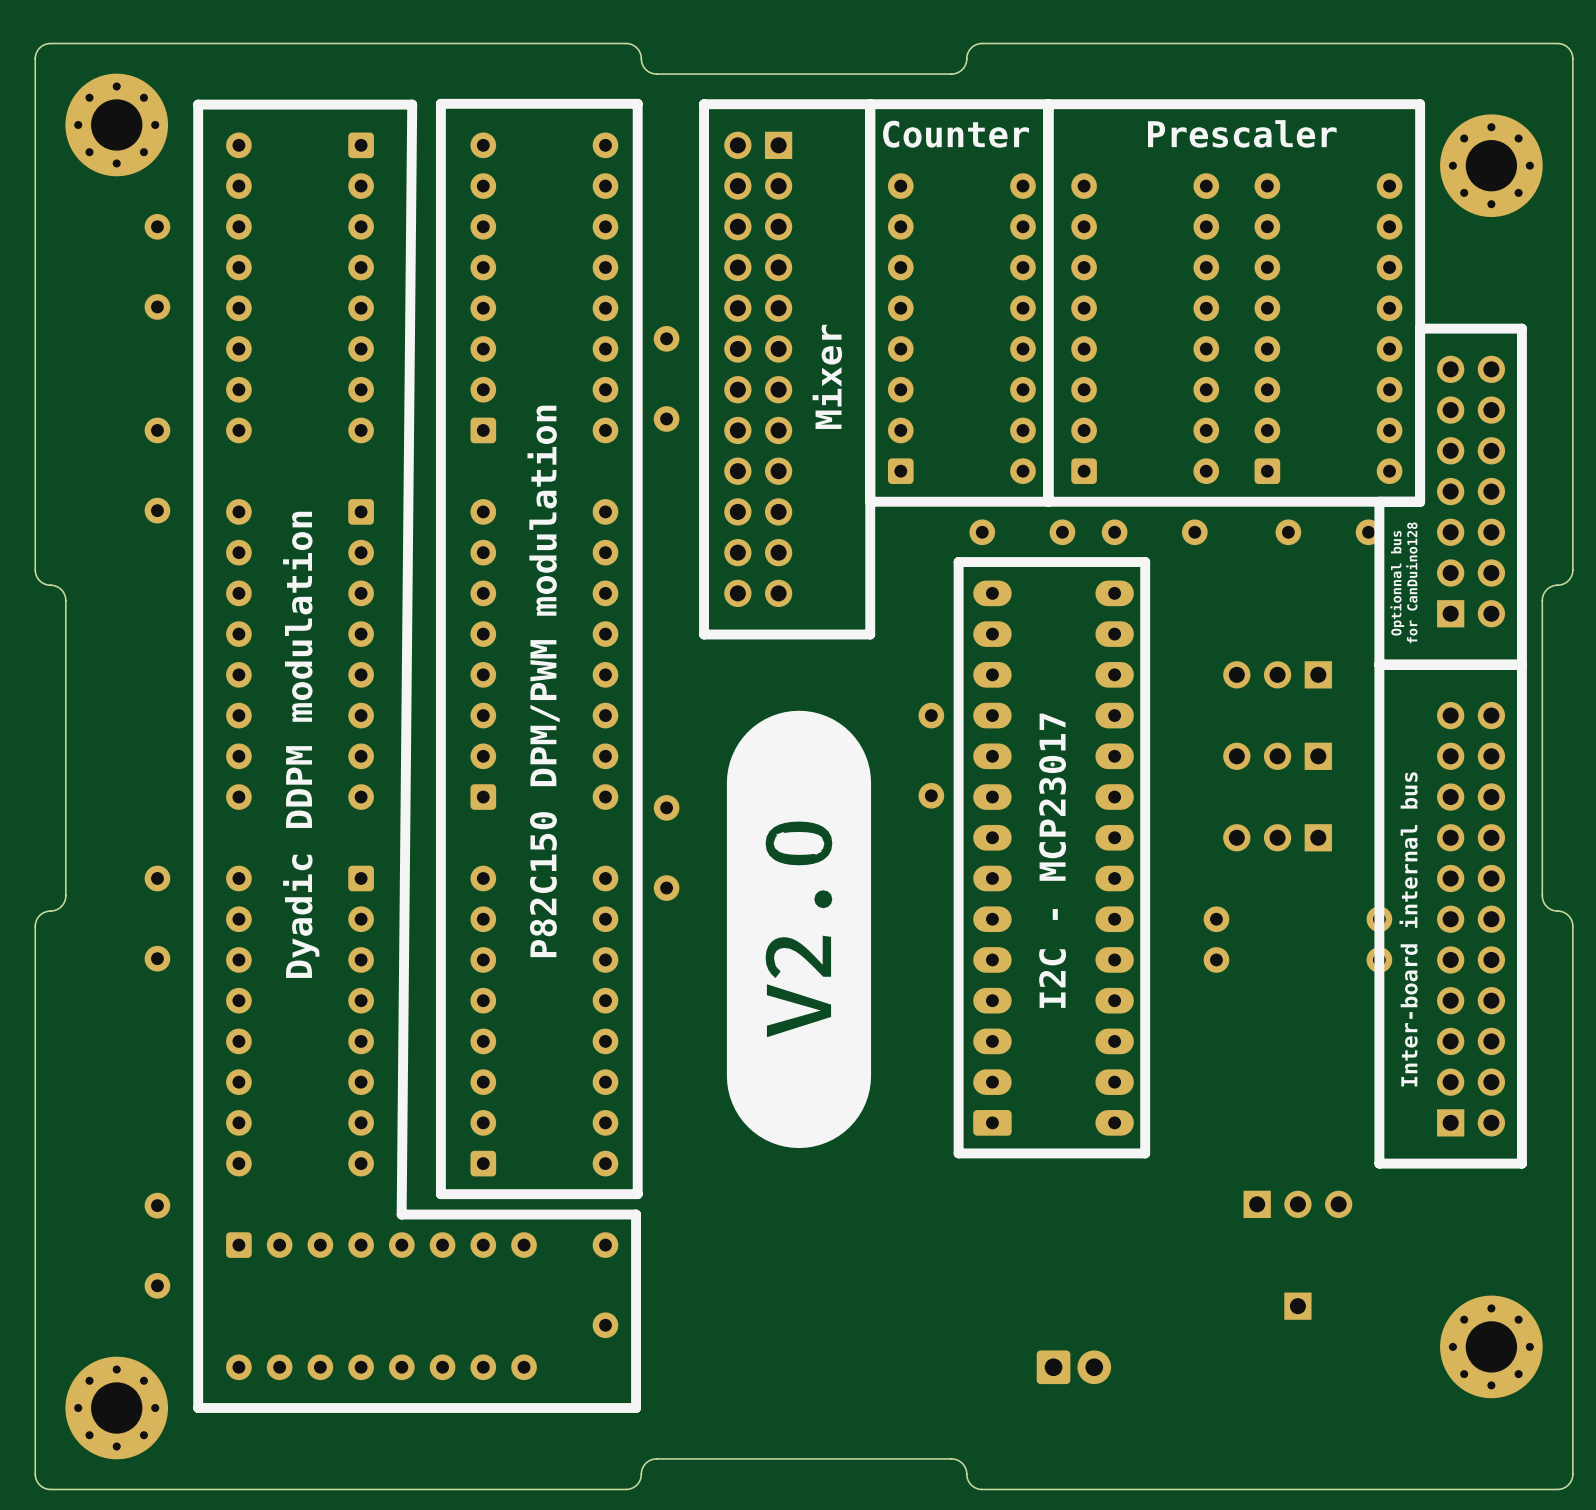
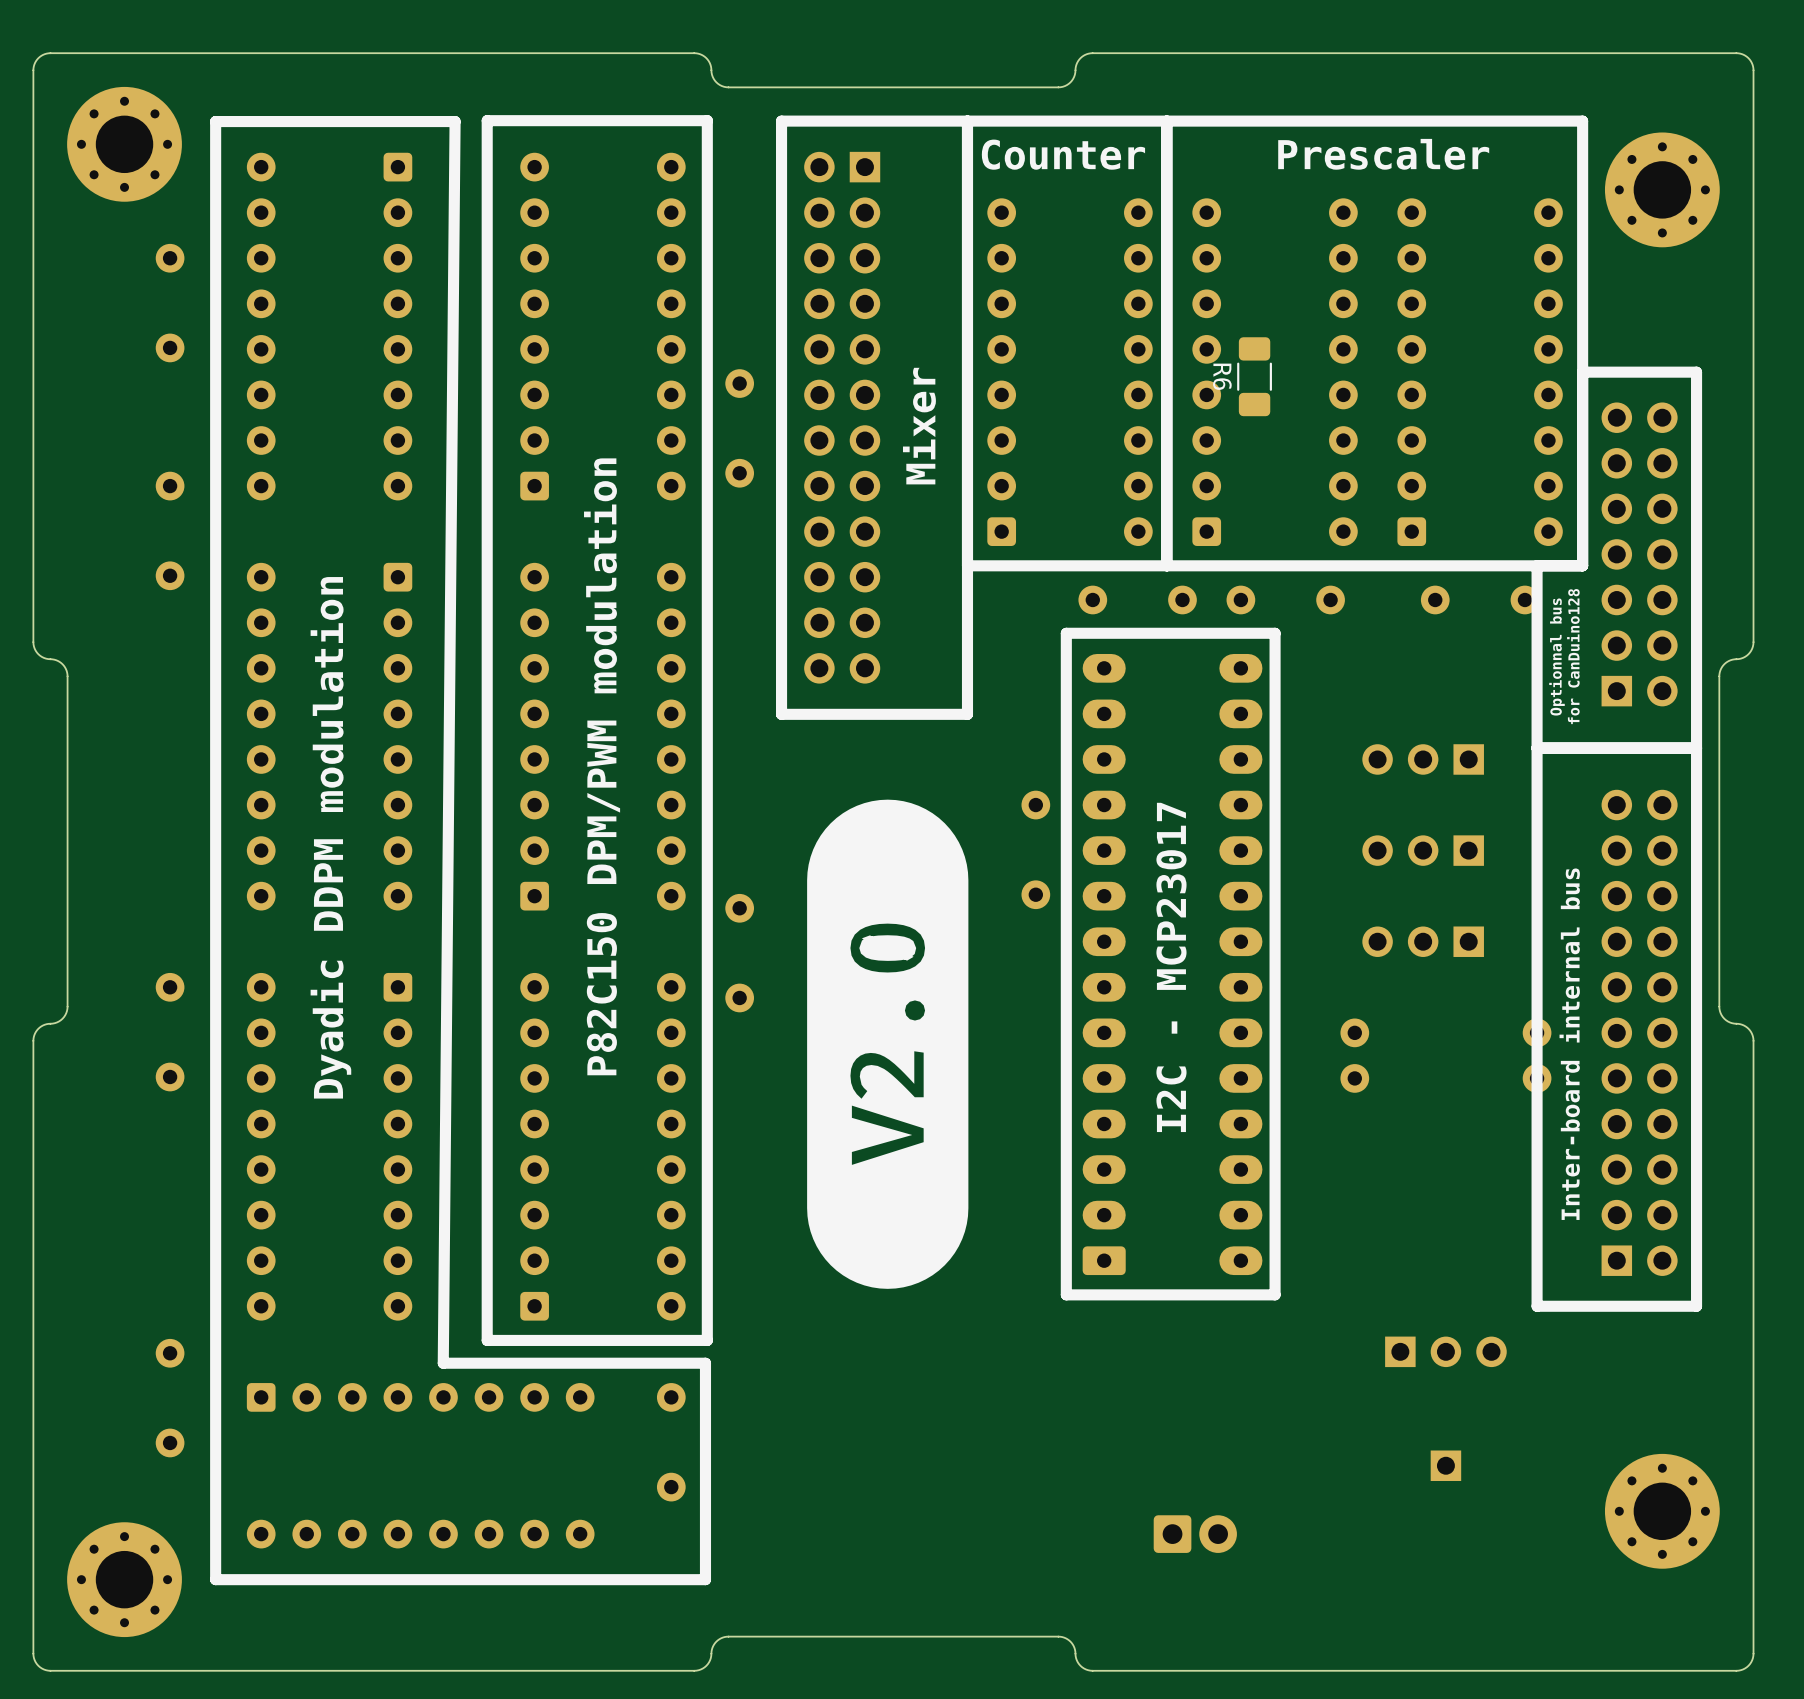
R6: none -> (1254, 376)

